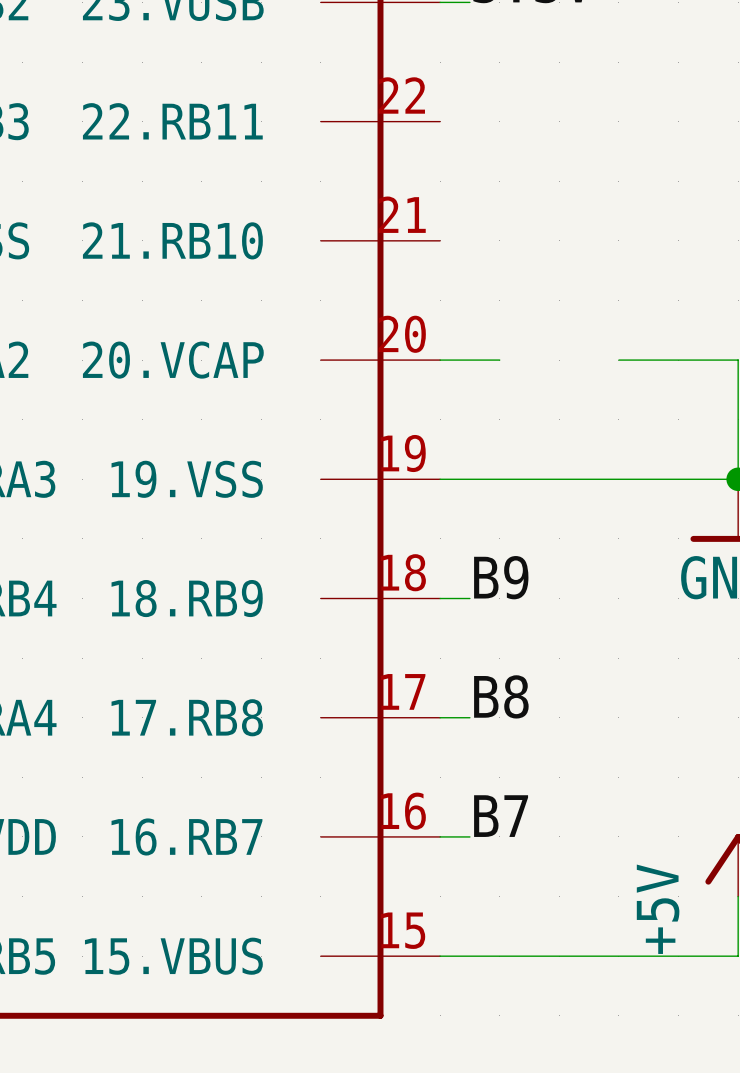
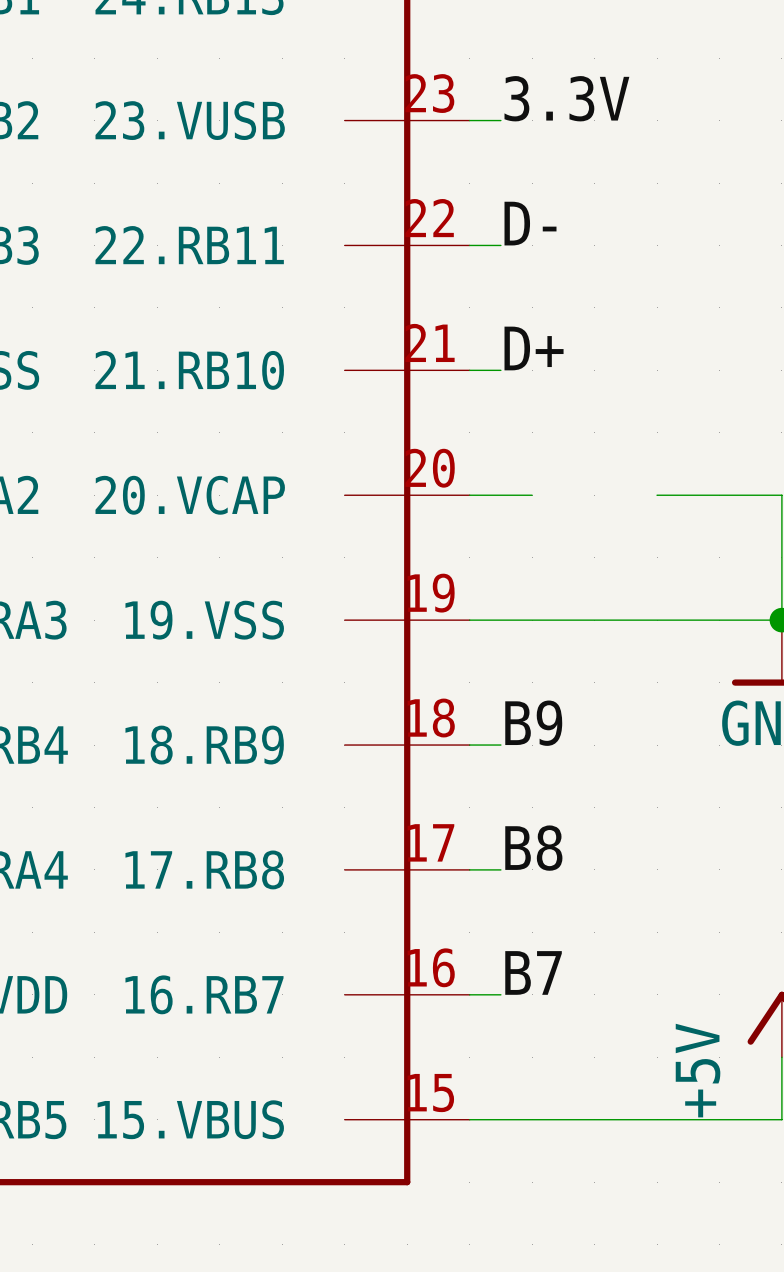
label: none -> D- (530, 223)
wire: none -> (469, 245) (500, 245)
label: none -> D+ (534, 348)
wire: none -> (469, 370) (500, 370)

